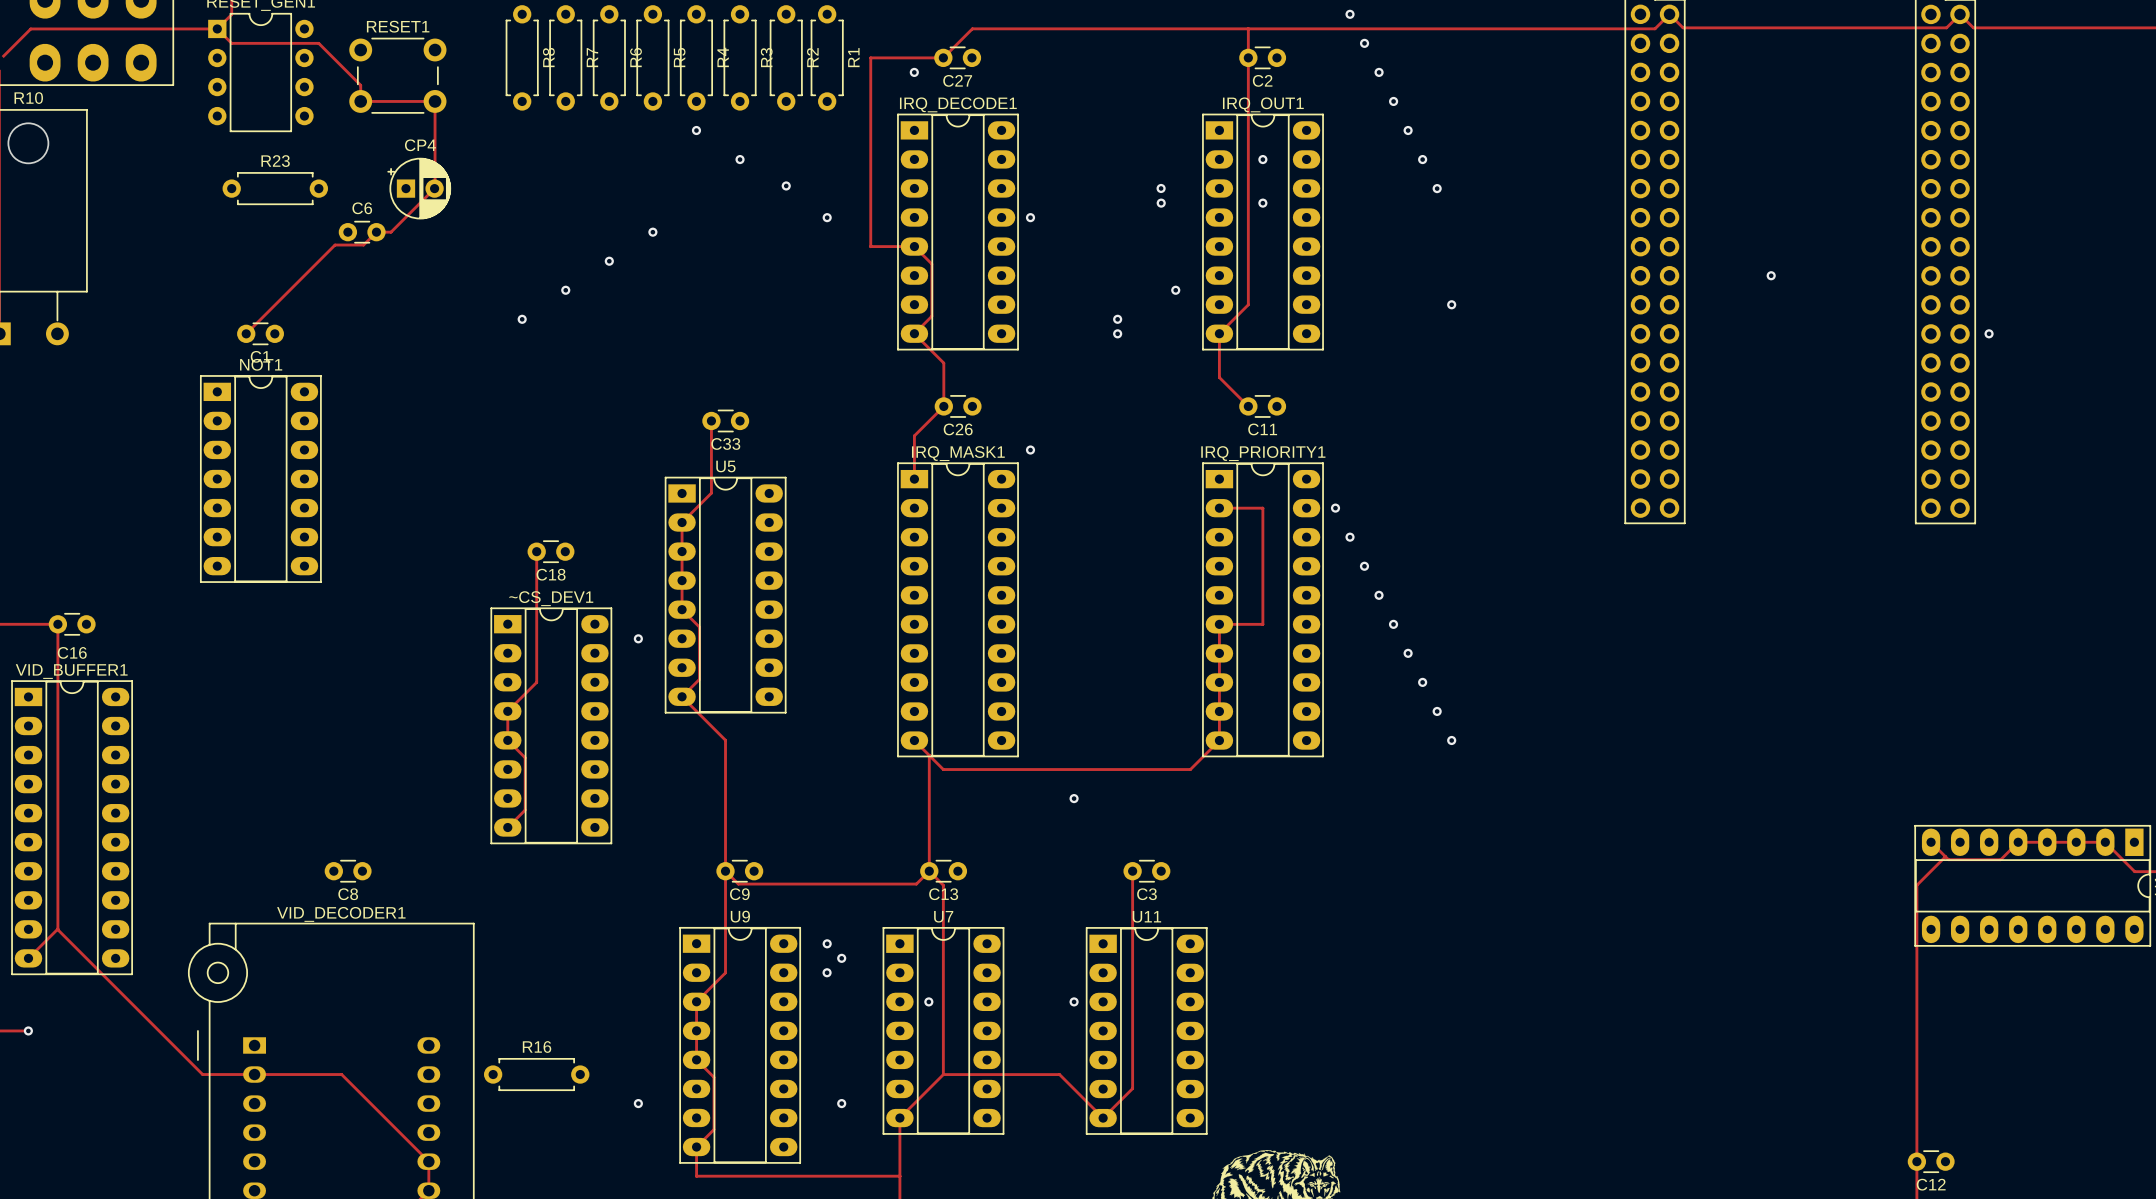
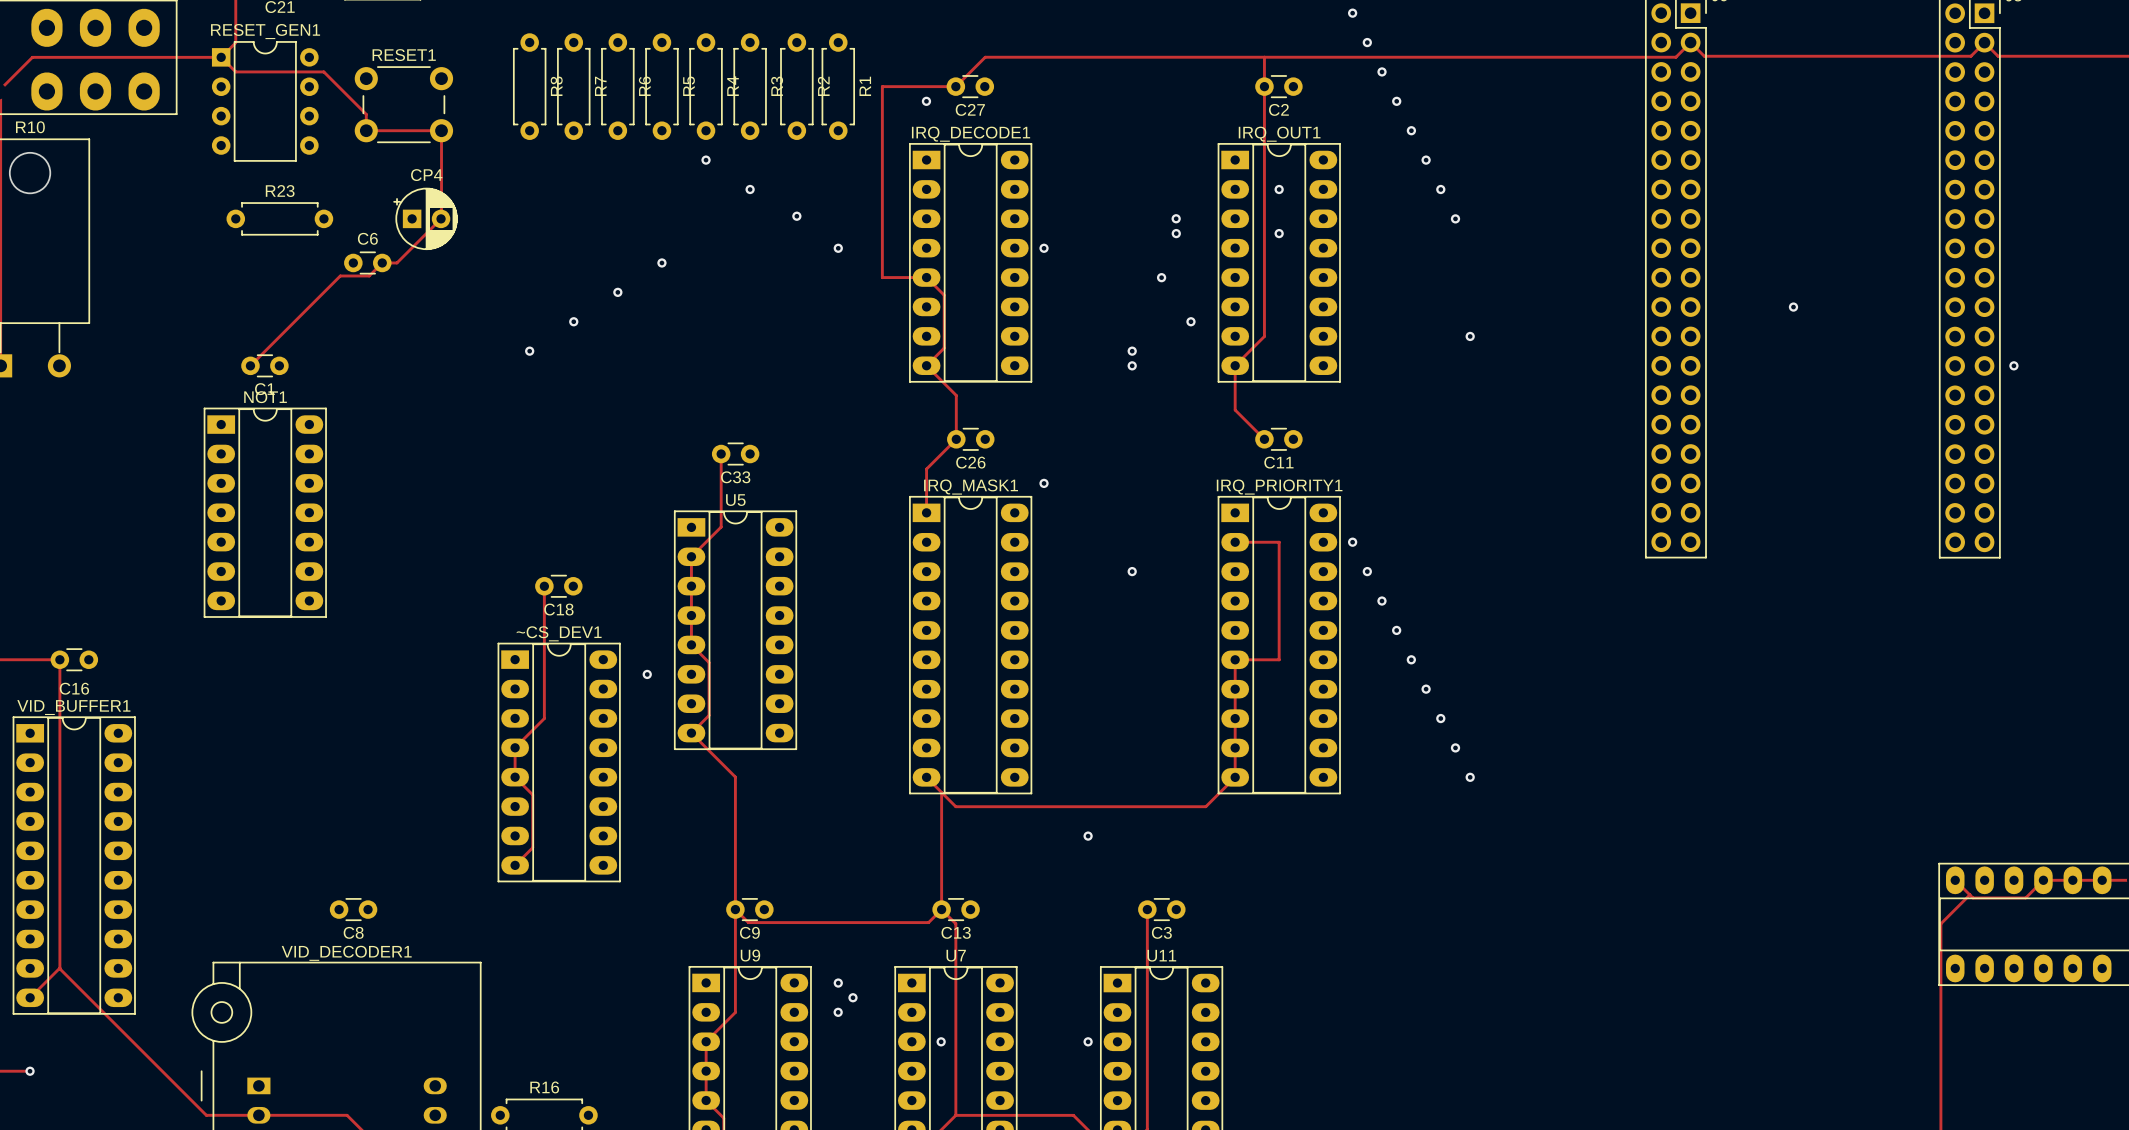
via: none -> (1161, 277)
via: none -> (1132, 571)

